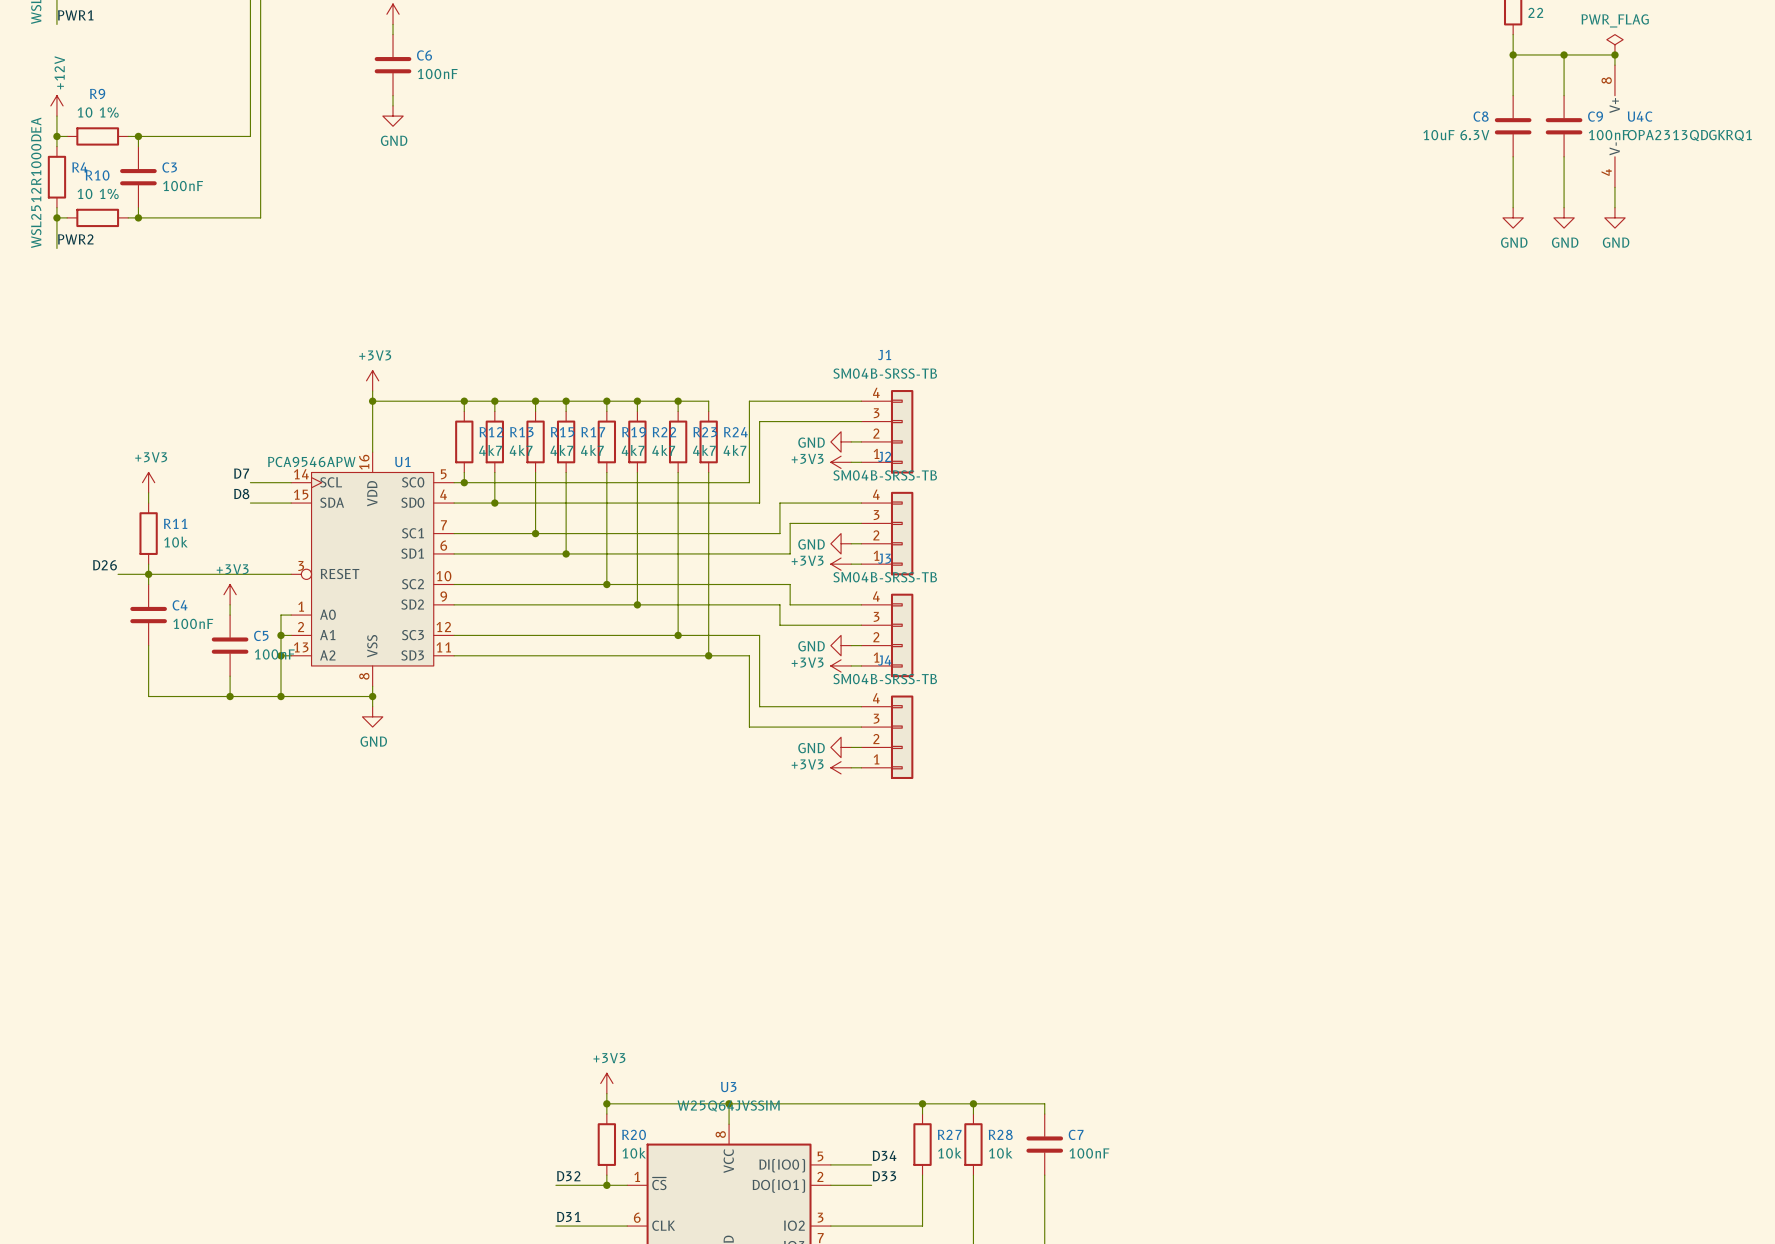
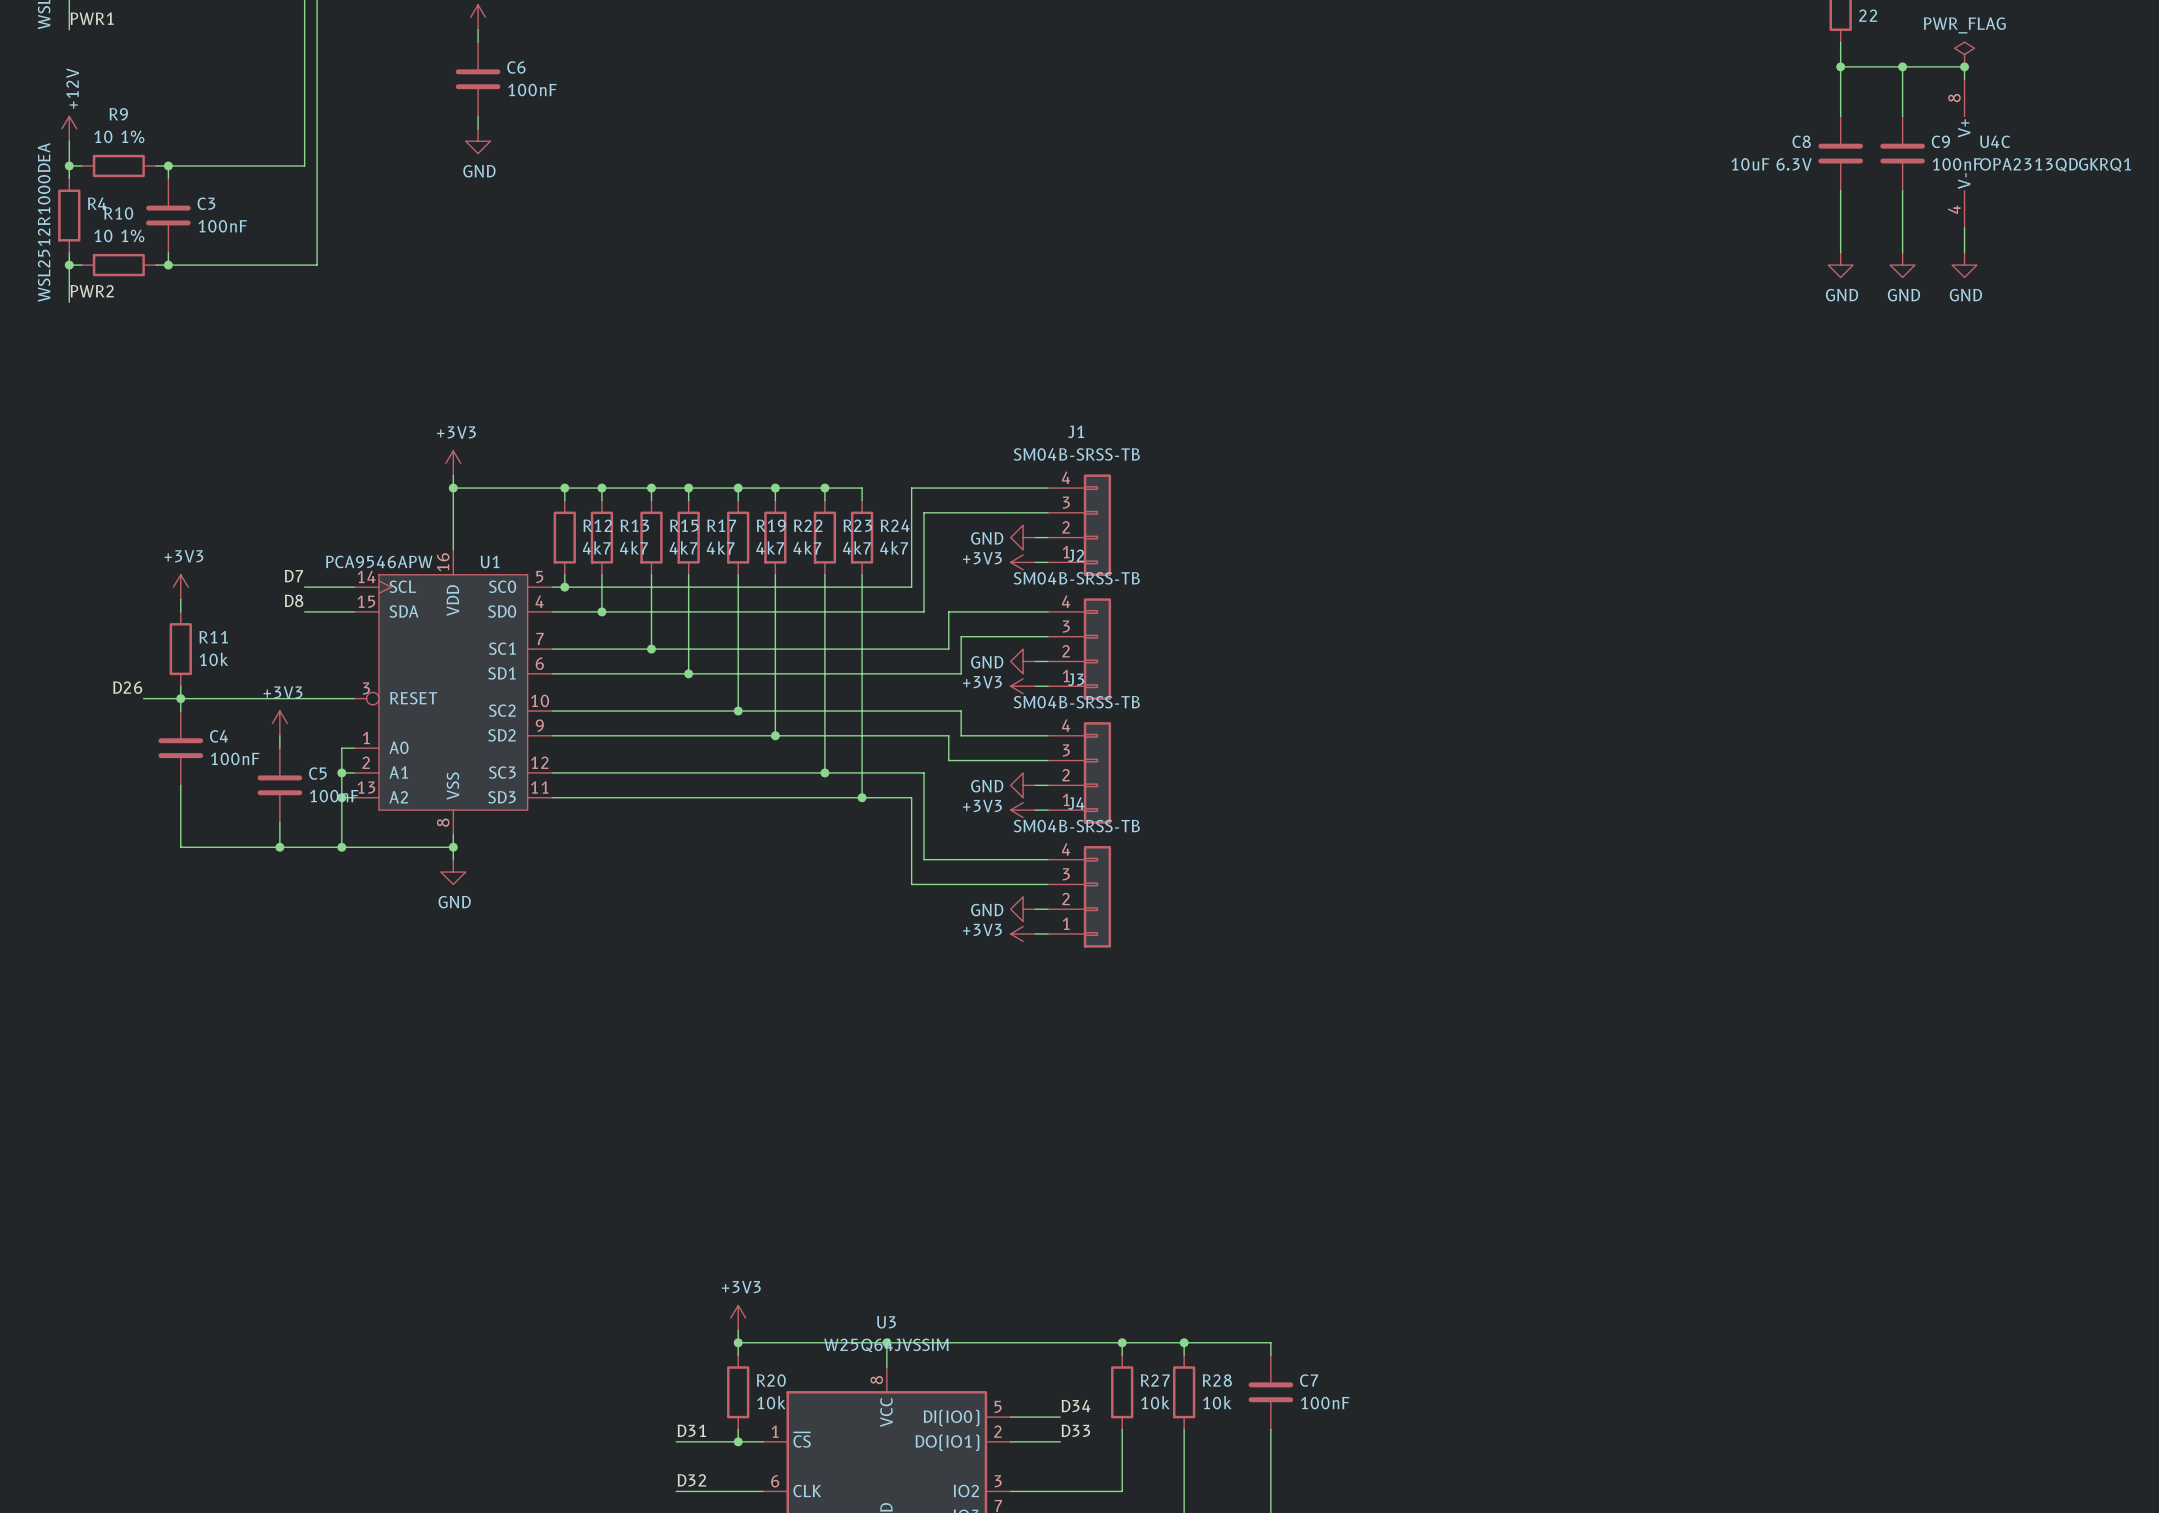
label: D32 (568, 1176) -> D31 (691, 1430)
label: D31 (568, 1216) -> D32 (691, 1480)

